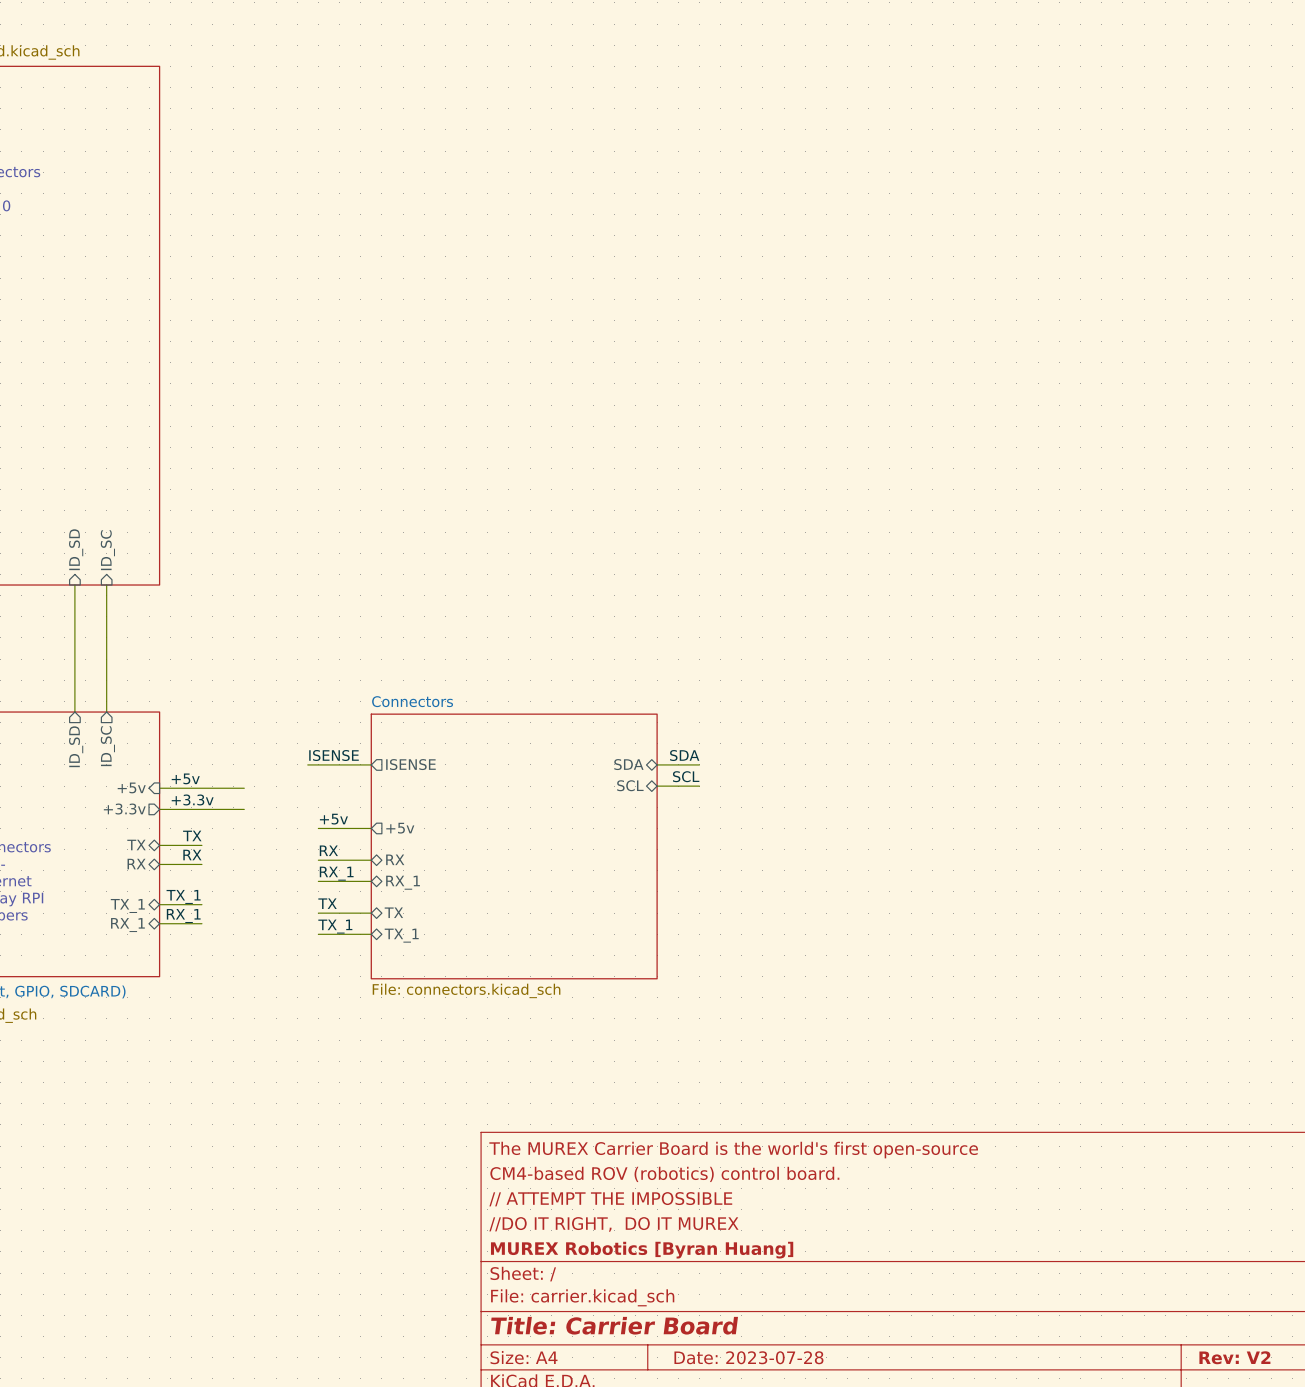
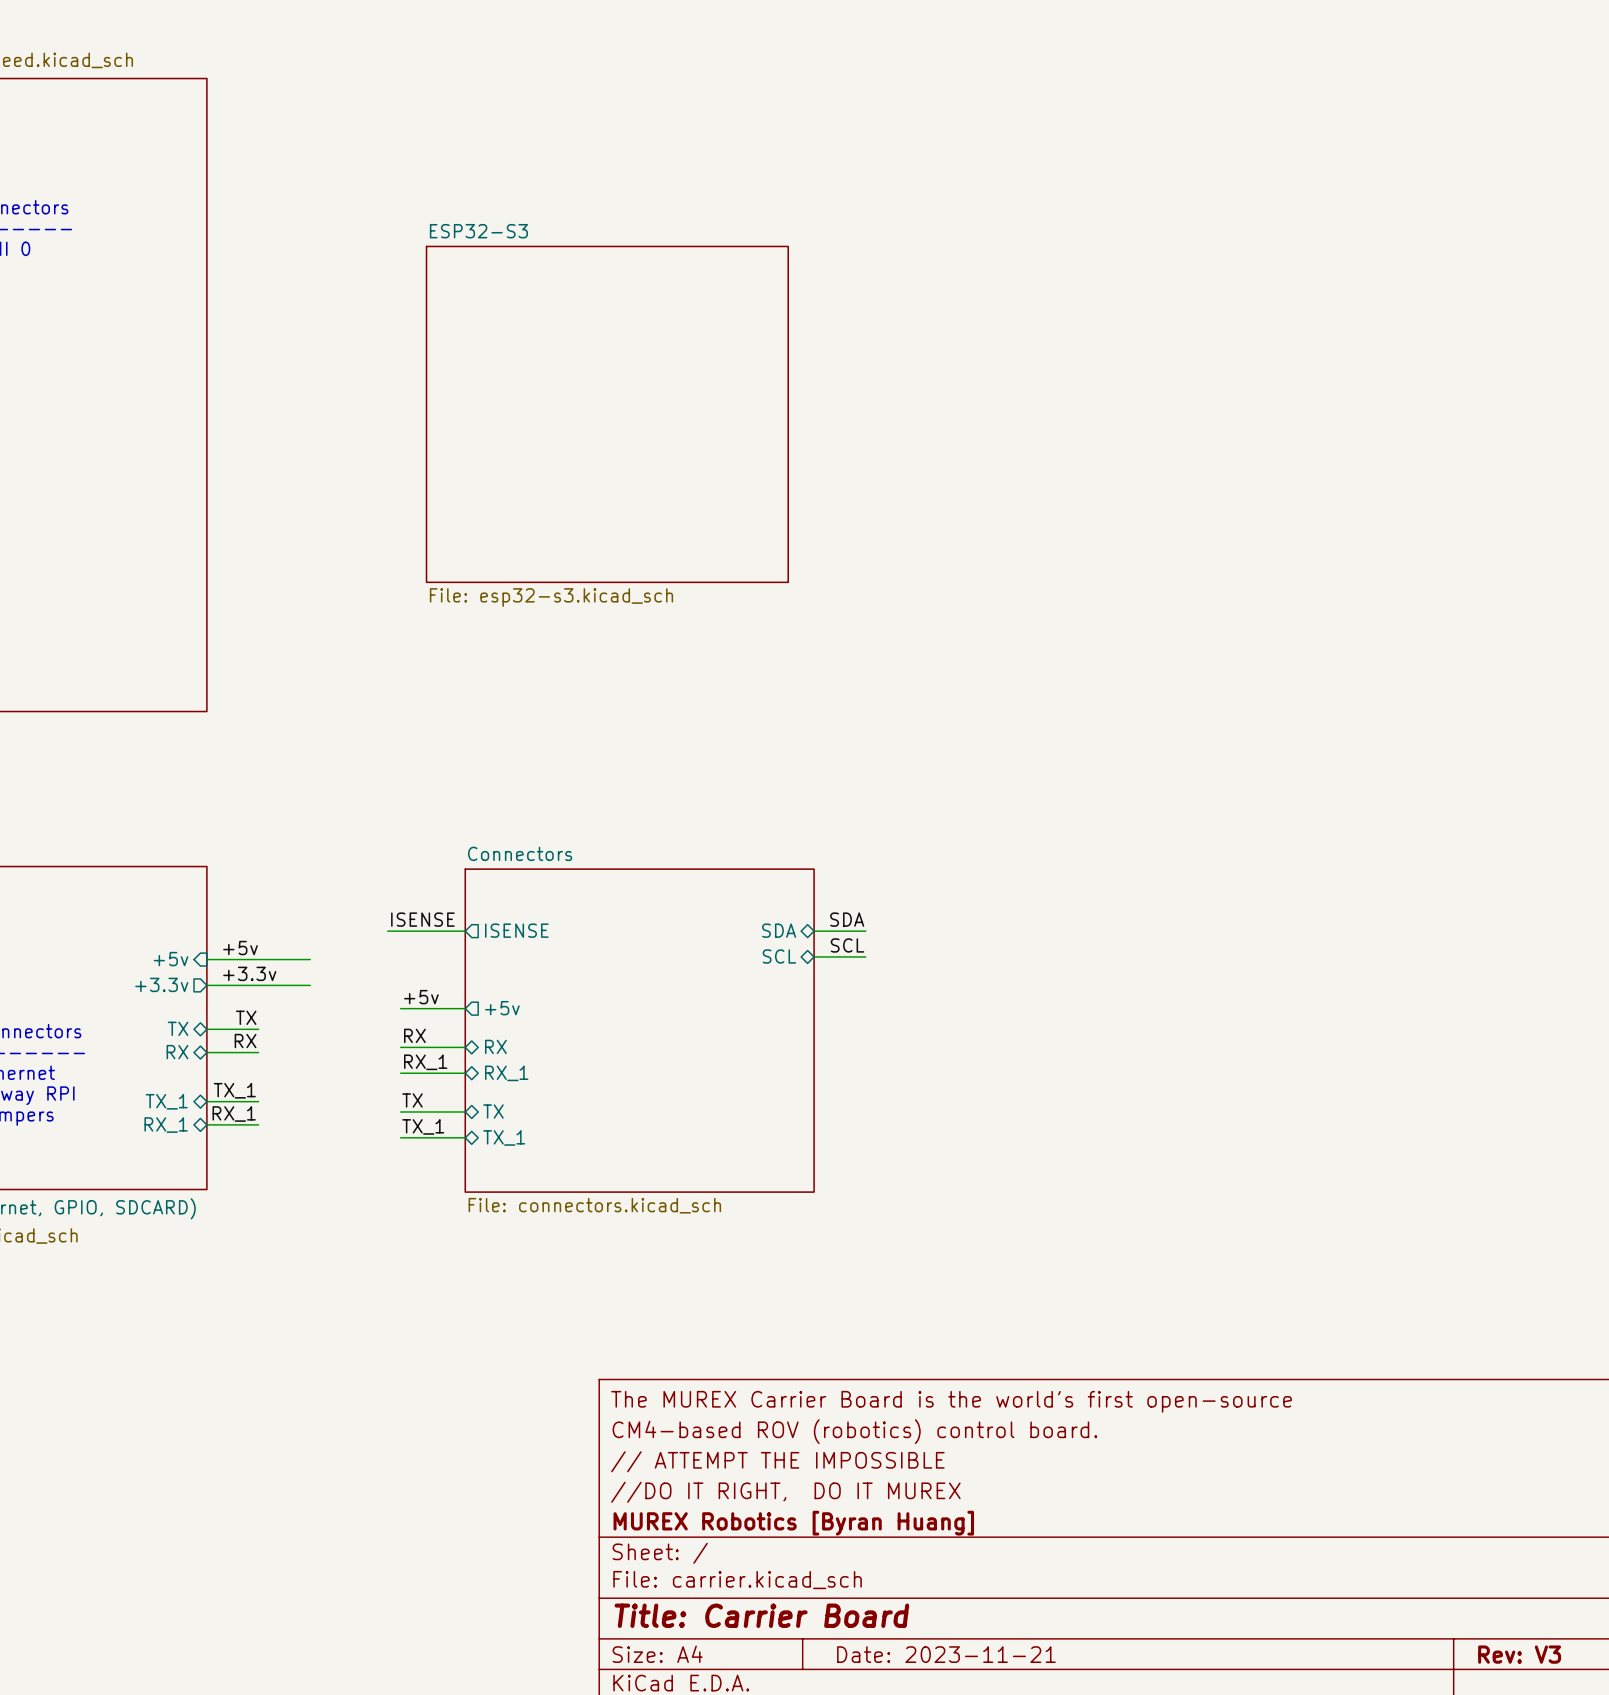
sheet ESP32-S3: none -> File: esp32-s3.kicad_sch (607, 414)
sheet pin: ID_SD (76, 549) -> none
sheet pin: ID_SC (107, 550) -> none
wire: (74, 585) (74, 712) -> none
wire: (106, 585) (106, 712) -> none
sheet pin: ID_SD (76, 746) -> none
sheet pin: ID_SC (107, 746) -> none
title block: Date: 2023-07-28 (748, 1357) -> Date: 2023-11-21 (946, 1654)
title block: Rev: V2 (1234, 1357) -> Rev: V3 (1519, 1654)

